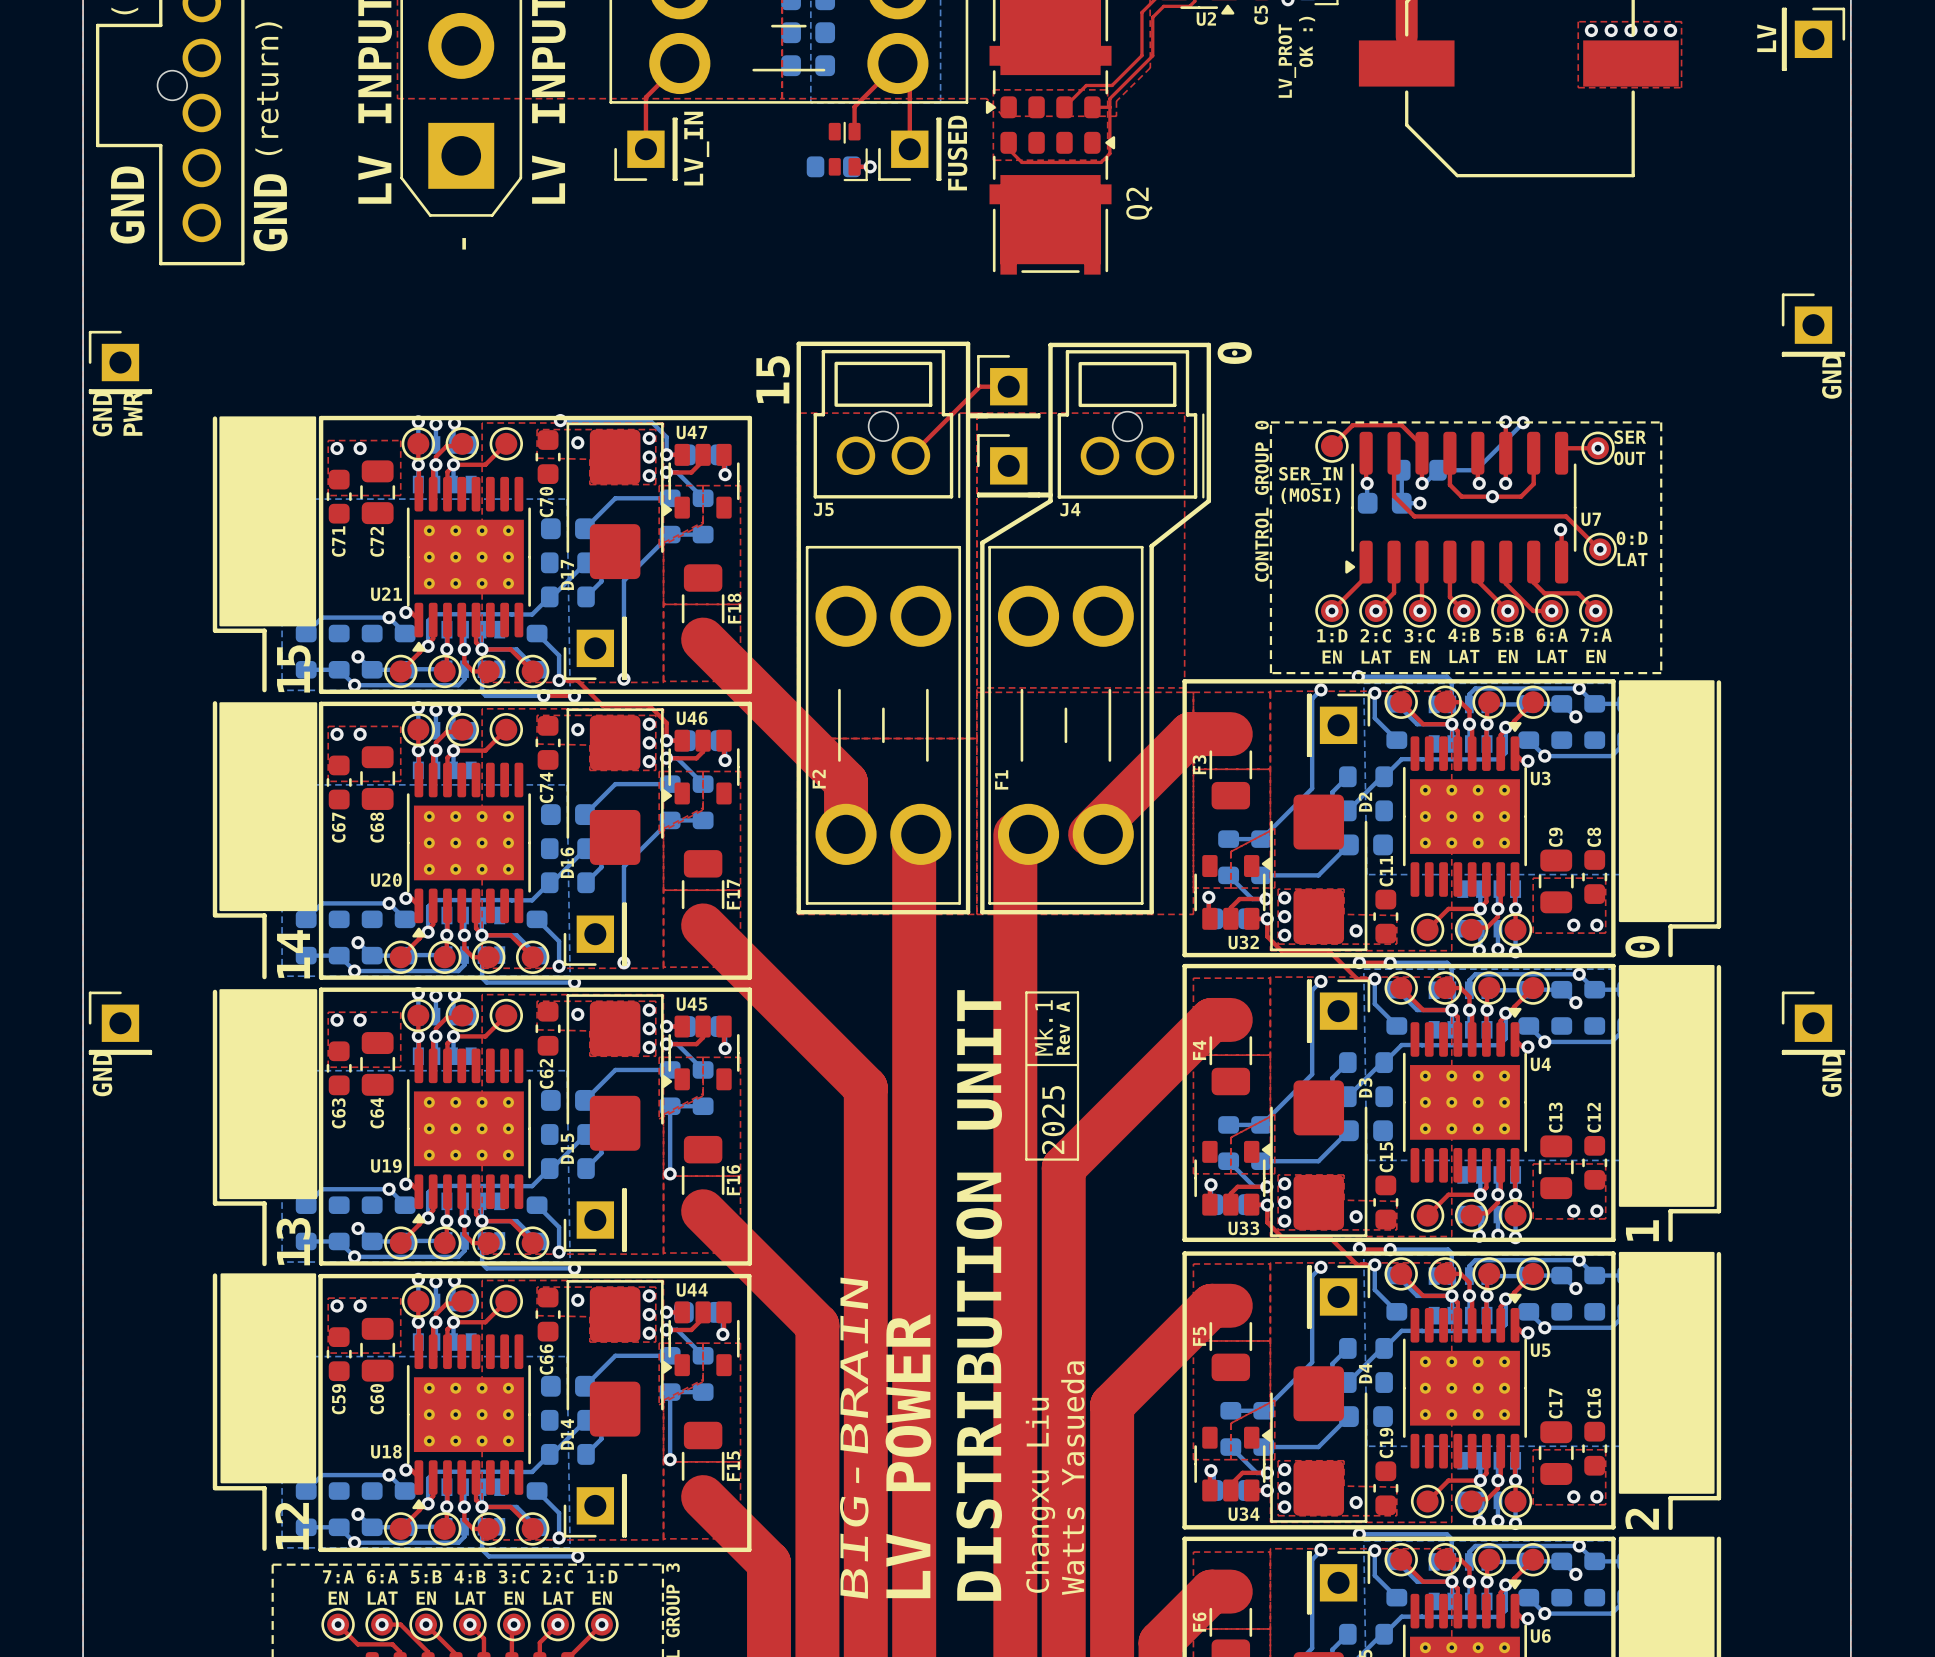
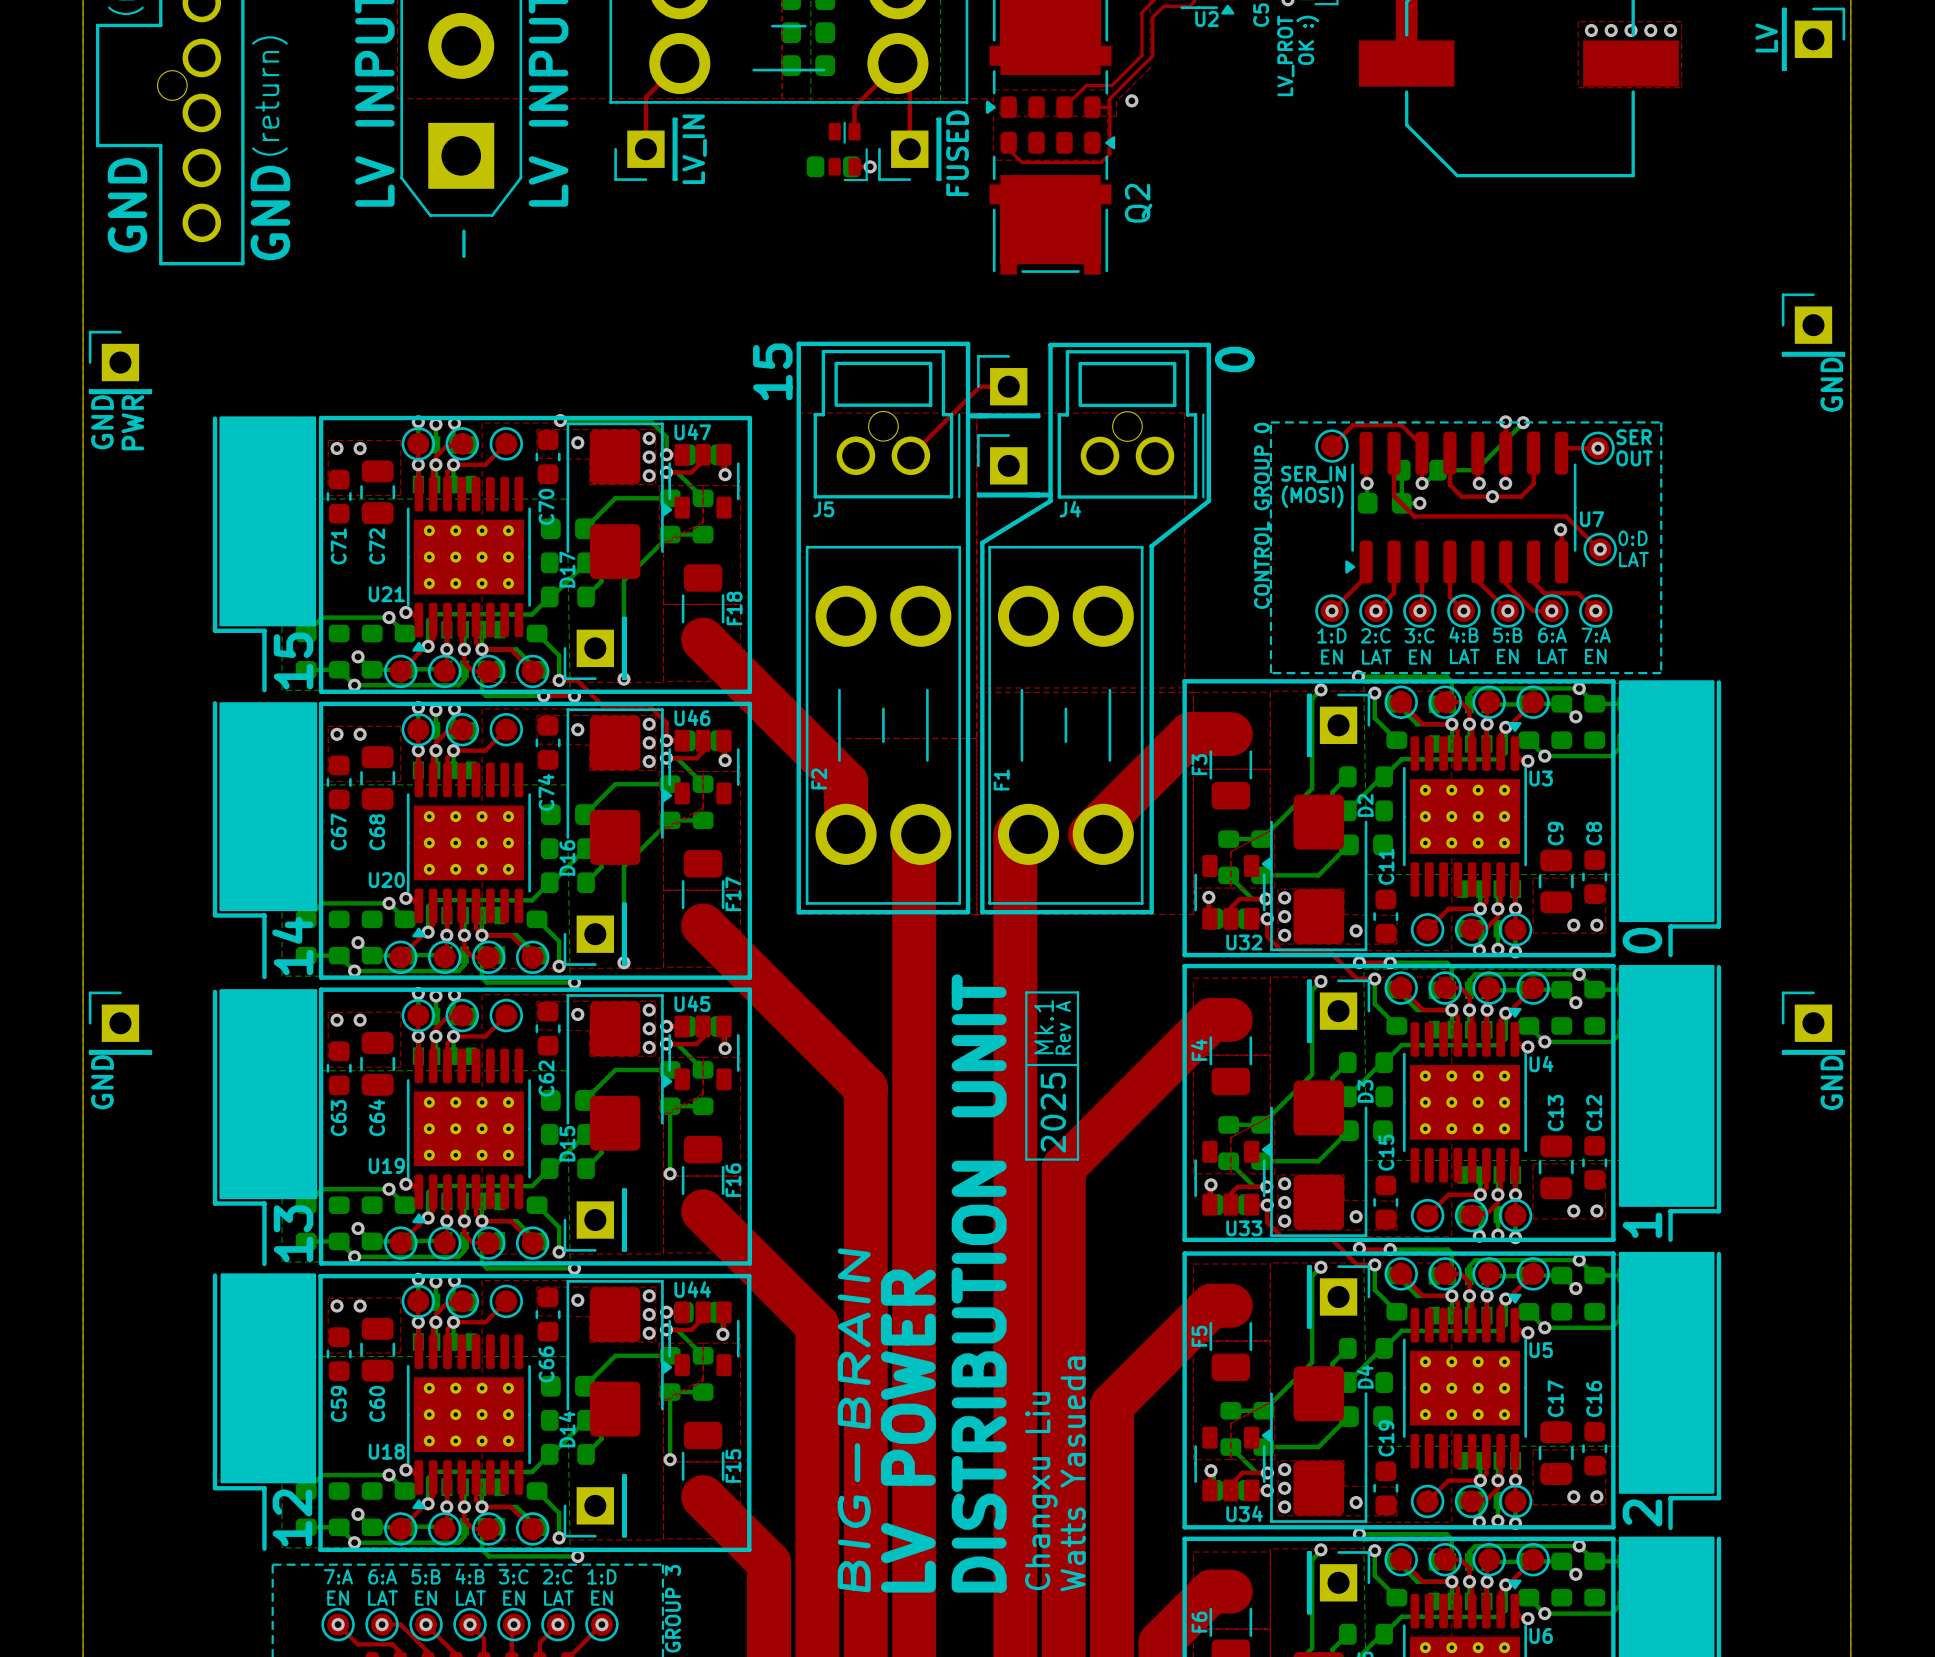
via: none -> (1131, 100)

